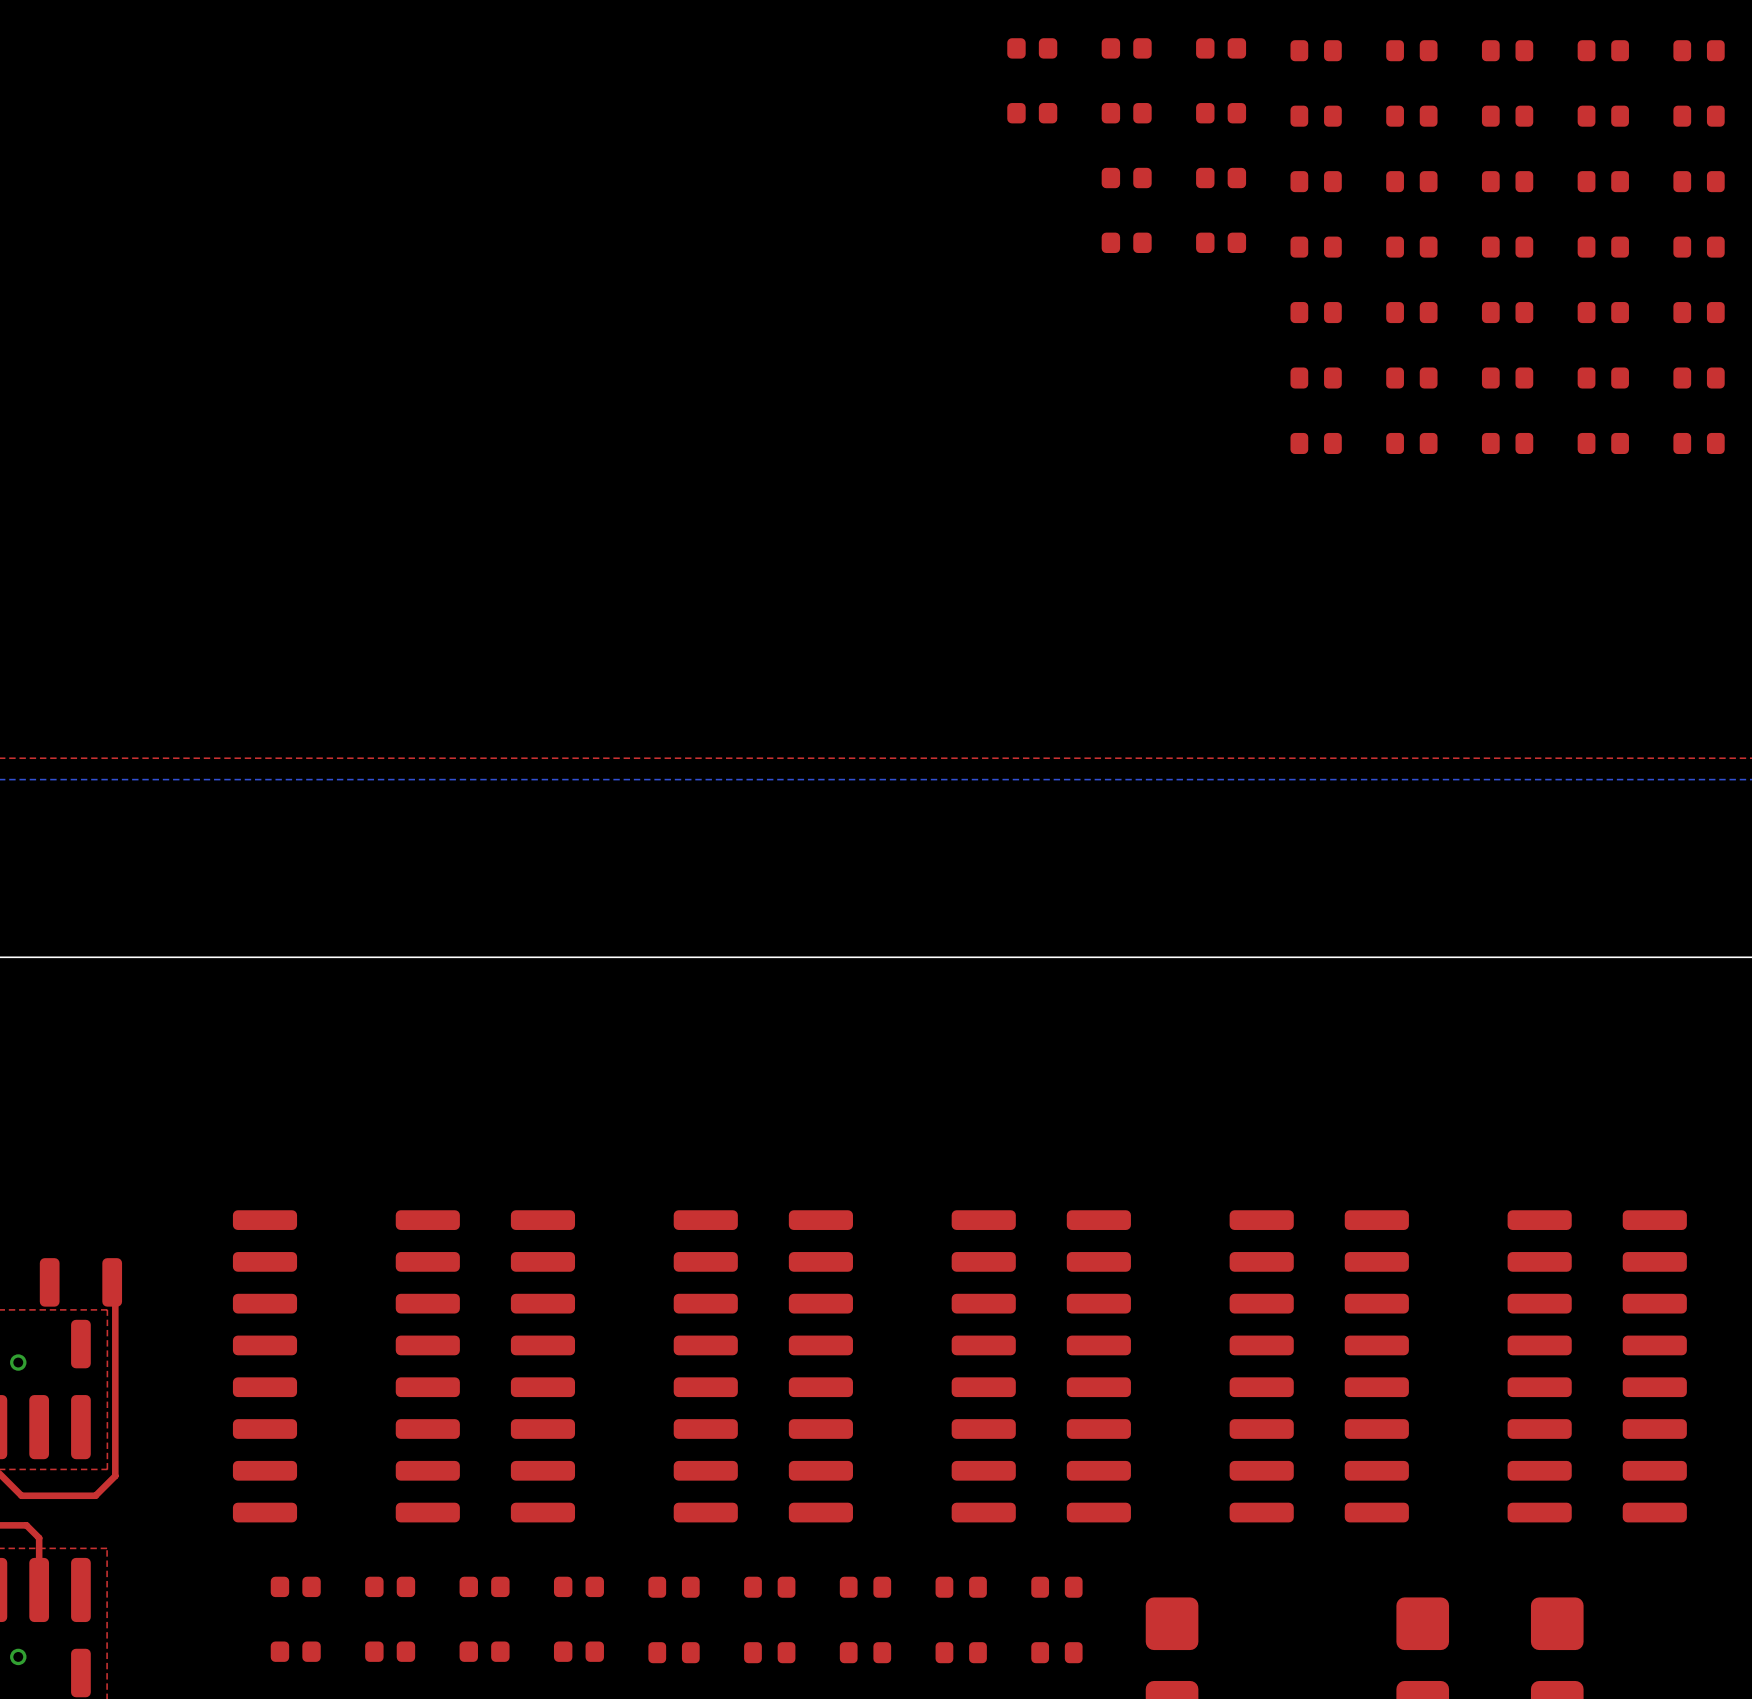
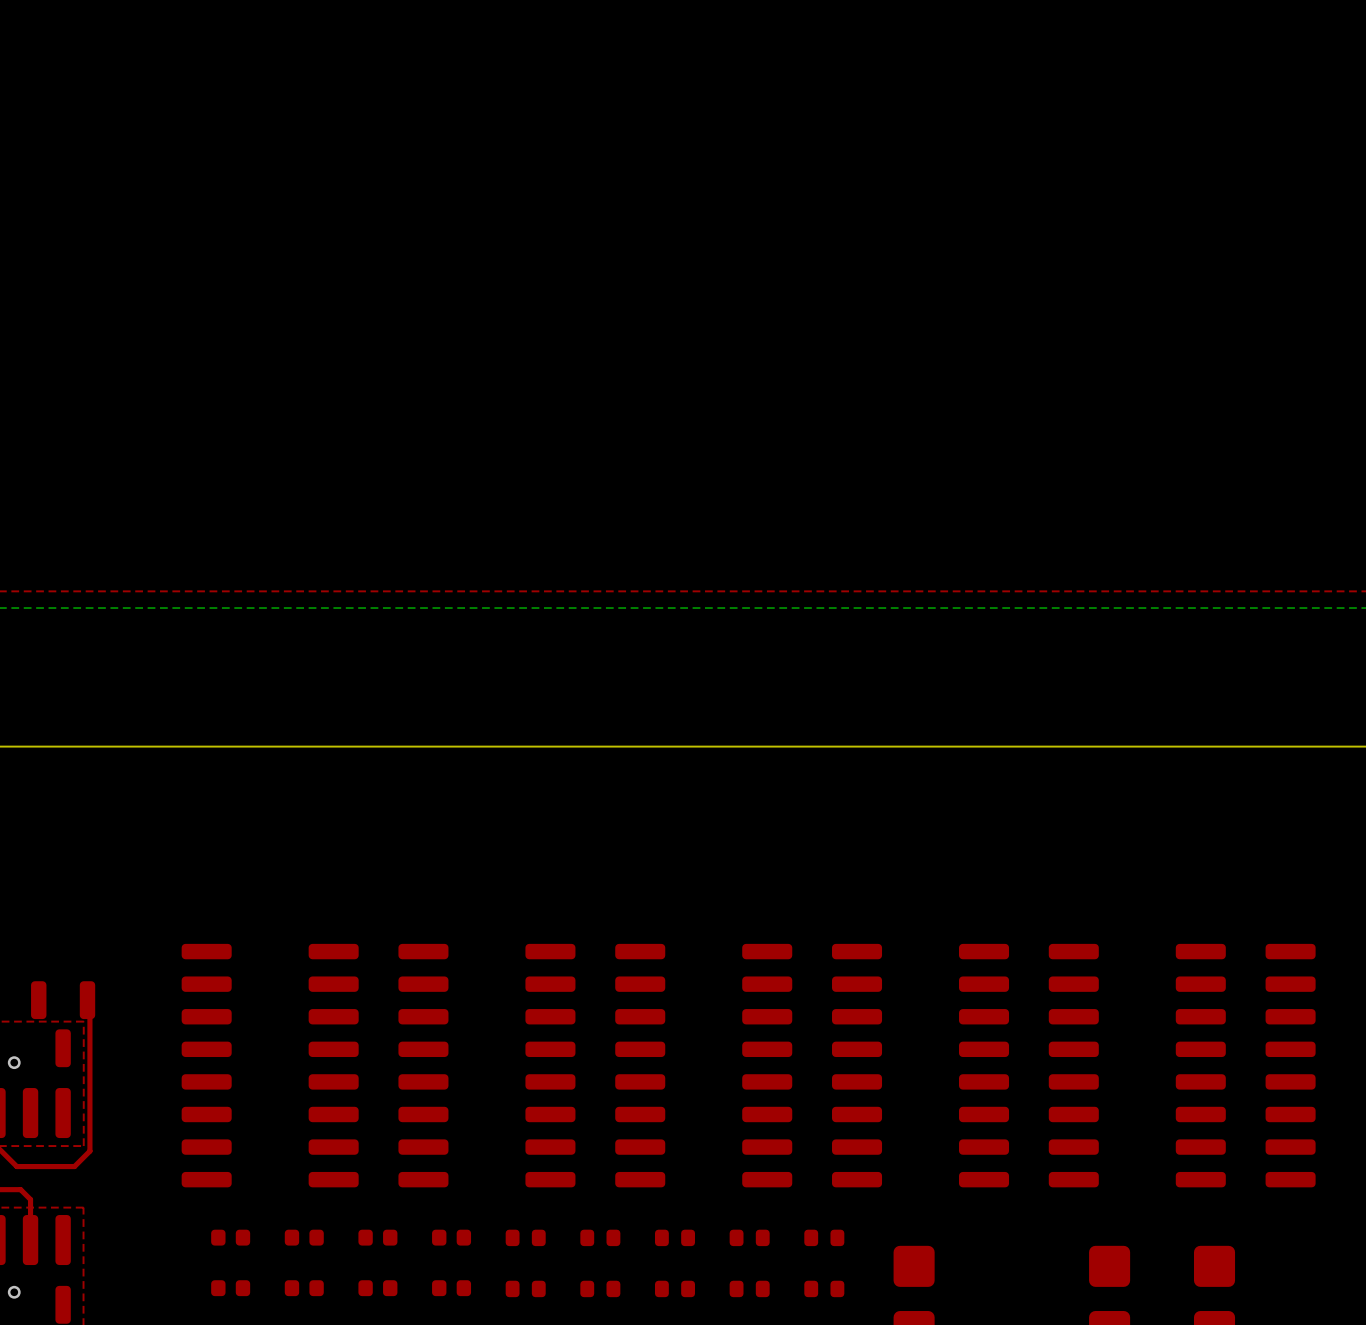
part: (1032, 48) -> none
part: (1126, 48) -> none
part: (1221, 48) -> none
part: (1316, 50) -> none
part: (1411, 50) -> none
part: (1507, 50) -> none
part: (1603, 50) -> none
part: (1699, 50) -> none
part: (1032, 113) -> none
part: (1126, 113) -> none
part: (1221, 113) -> none
part: (1316, 116) -> none
part: (1411, 116) -> none
part: (1507, 116) -> none
part: (1603, 116) -> none
part: (1699, 116) -> none
part: (1126, 178) -> none
part: (1221, 178) -> none
part: (1316, 181) -> none
part: (1411, 181) -> none
part: (1507, 181) -> none
part: (1603, 181) -> none
part: (1699, 181) -> none
part: (1126, 242) -> none
part: (1221, 242) -> none
part: (1316, 247) -> none
part: (1411, 247) -> none
part: (1507, 247) -> none
part: (1603, 247) -> none
part: (1699, 247) -> none
part: (1316, 312) -> none
part: (1411, 312) -> none
part: (1507, 312) -> none
part: (1603, 312) -> none
part: (1699, 312) -> none
part: (1316, 378) -> none
part: (1411, 378) -> none
part: (1507, 378) -> none
part: (1603, 378) -> none
part: (1699, 378) -> none
part: (1316, 443) -> none
part: (1411, 443) -> none
part: (1507, 443) -> none
part: (1603, 443) -> none
part: (1699, 443) -> none

